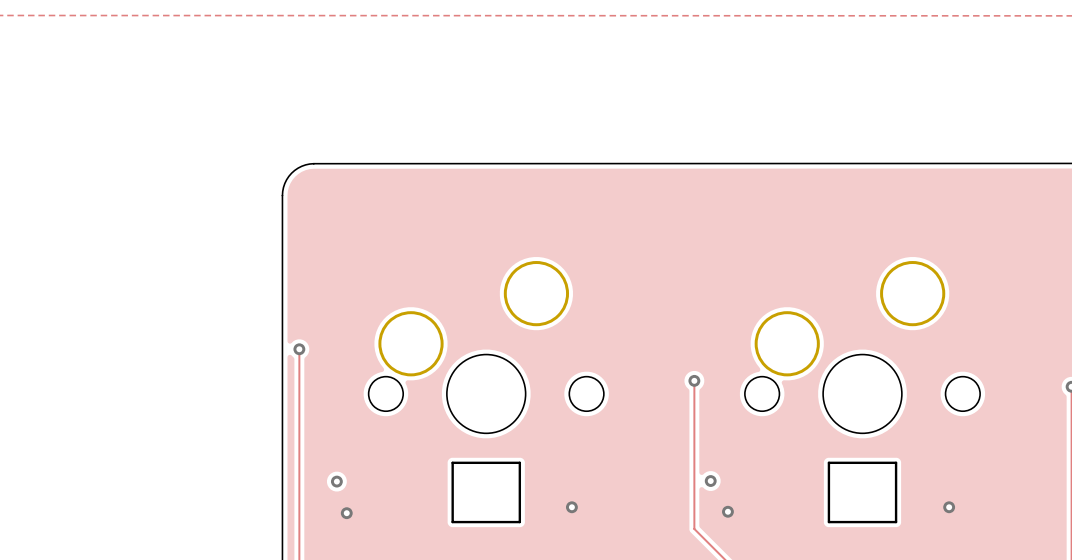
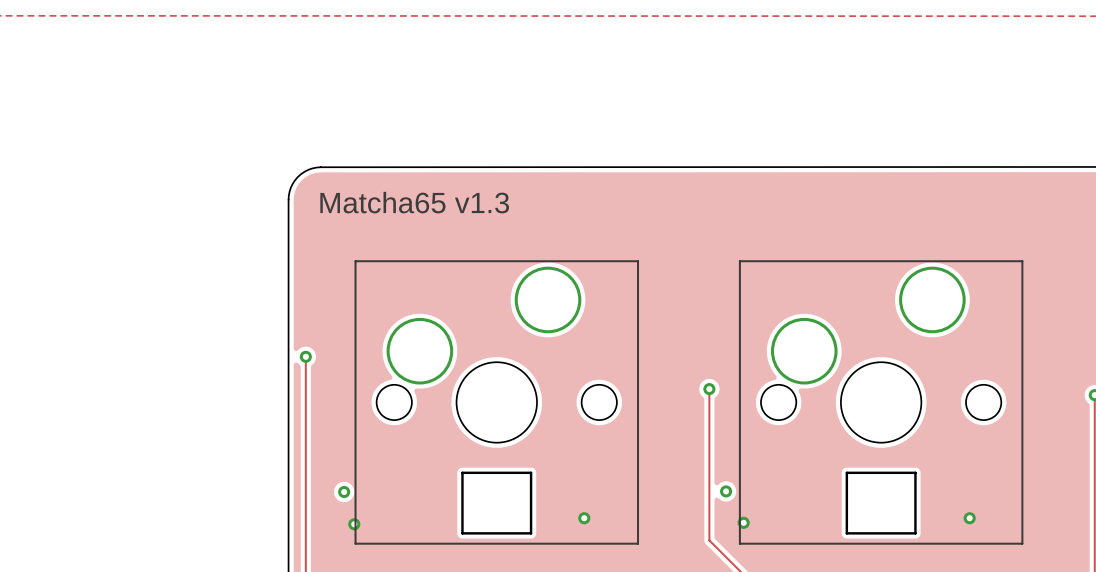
text: none -> Matcha65 v1.3 (414, 202)
line: none -> (355, 261) (638, 261) (638, 543) (355, 543) (355, 261)
line: none -> (739, 261) (1022, 261) (1022, 543) (739, 543) (739, 261)

